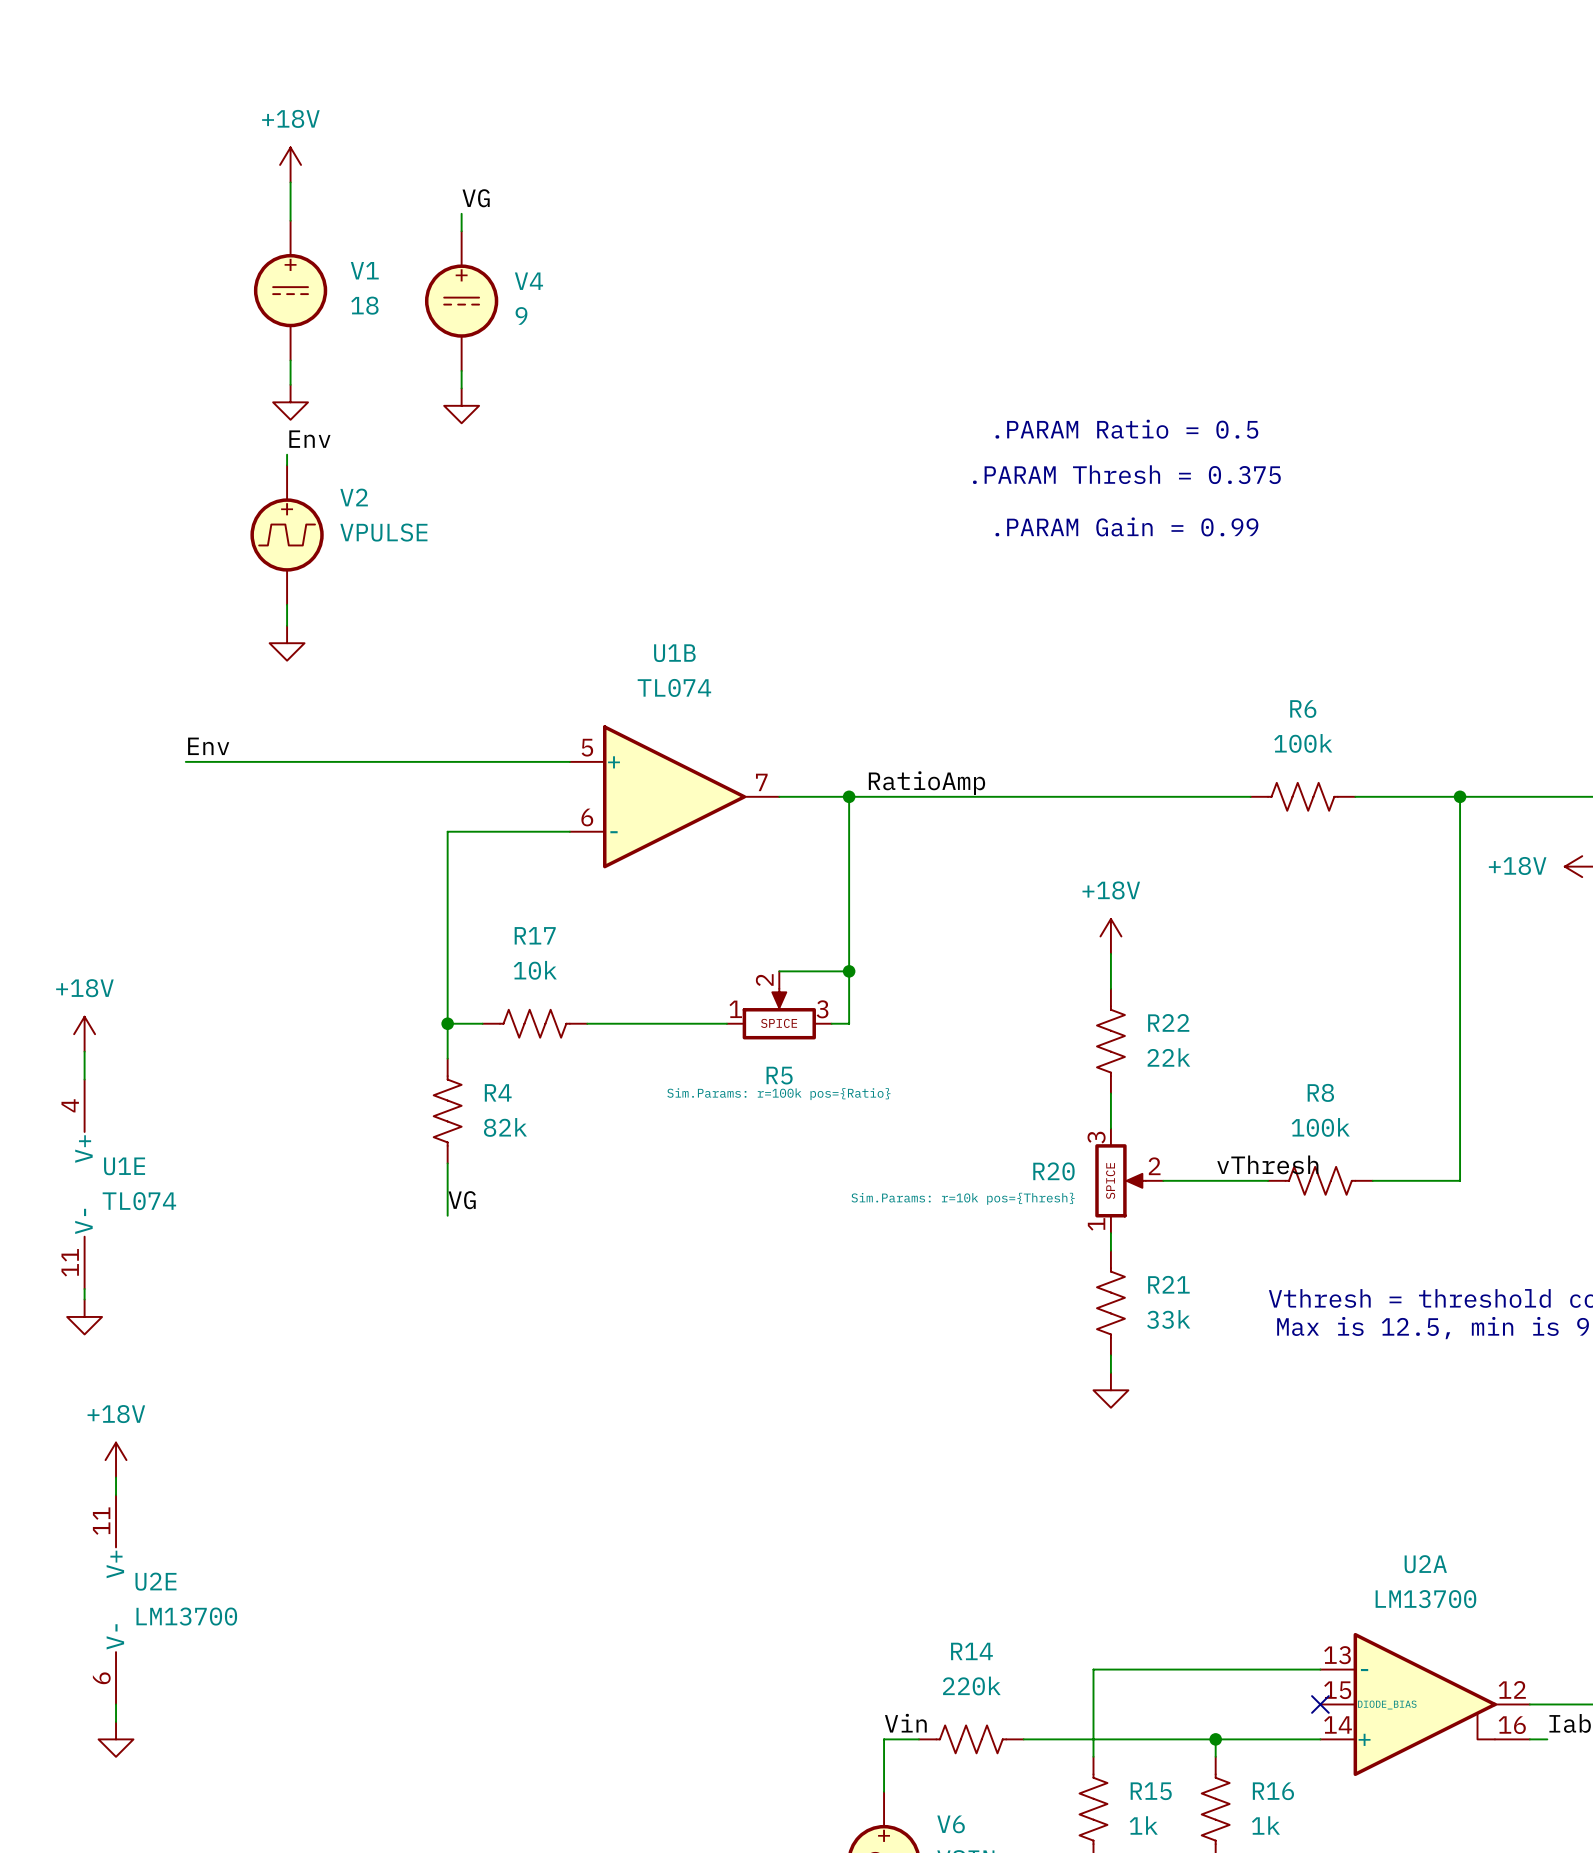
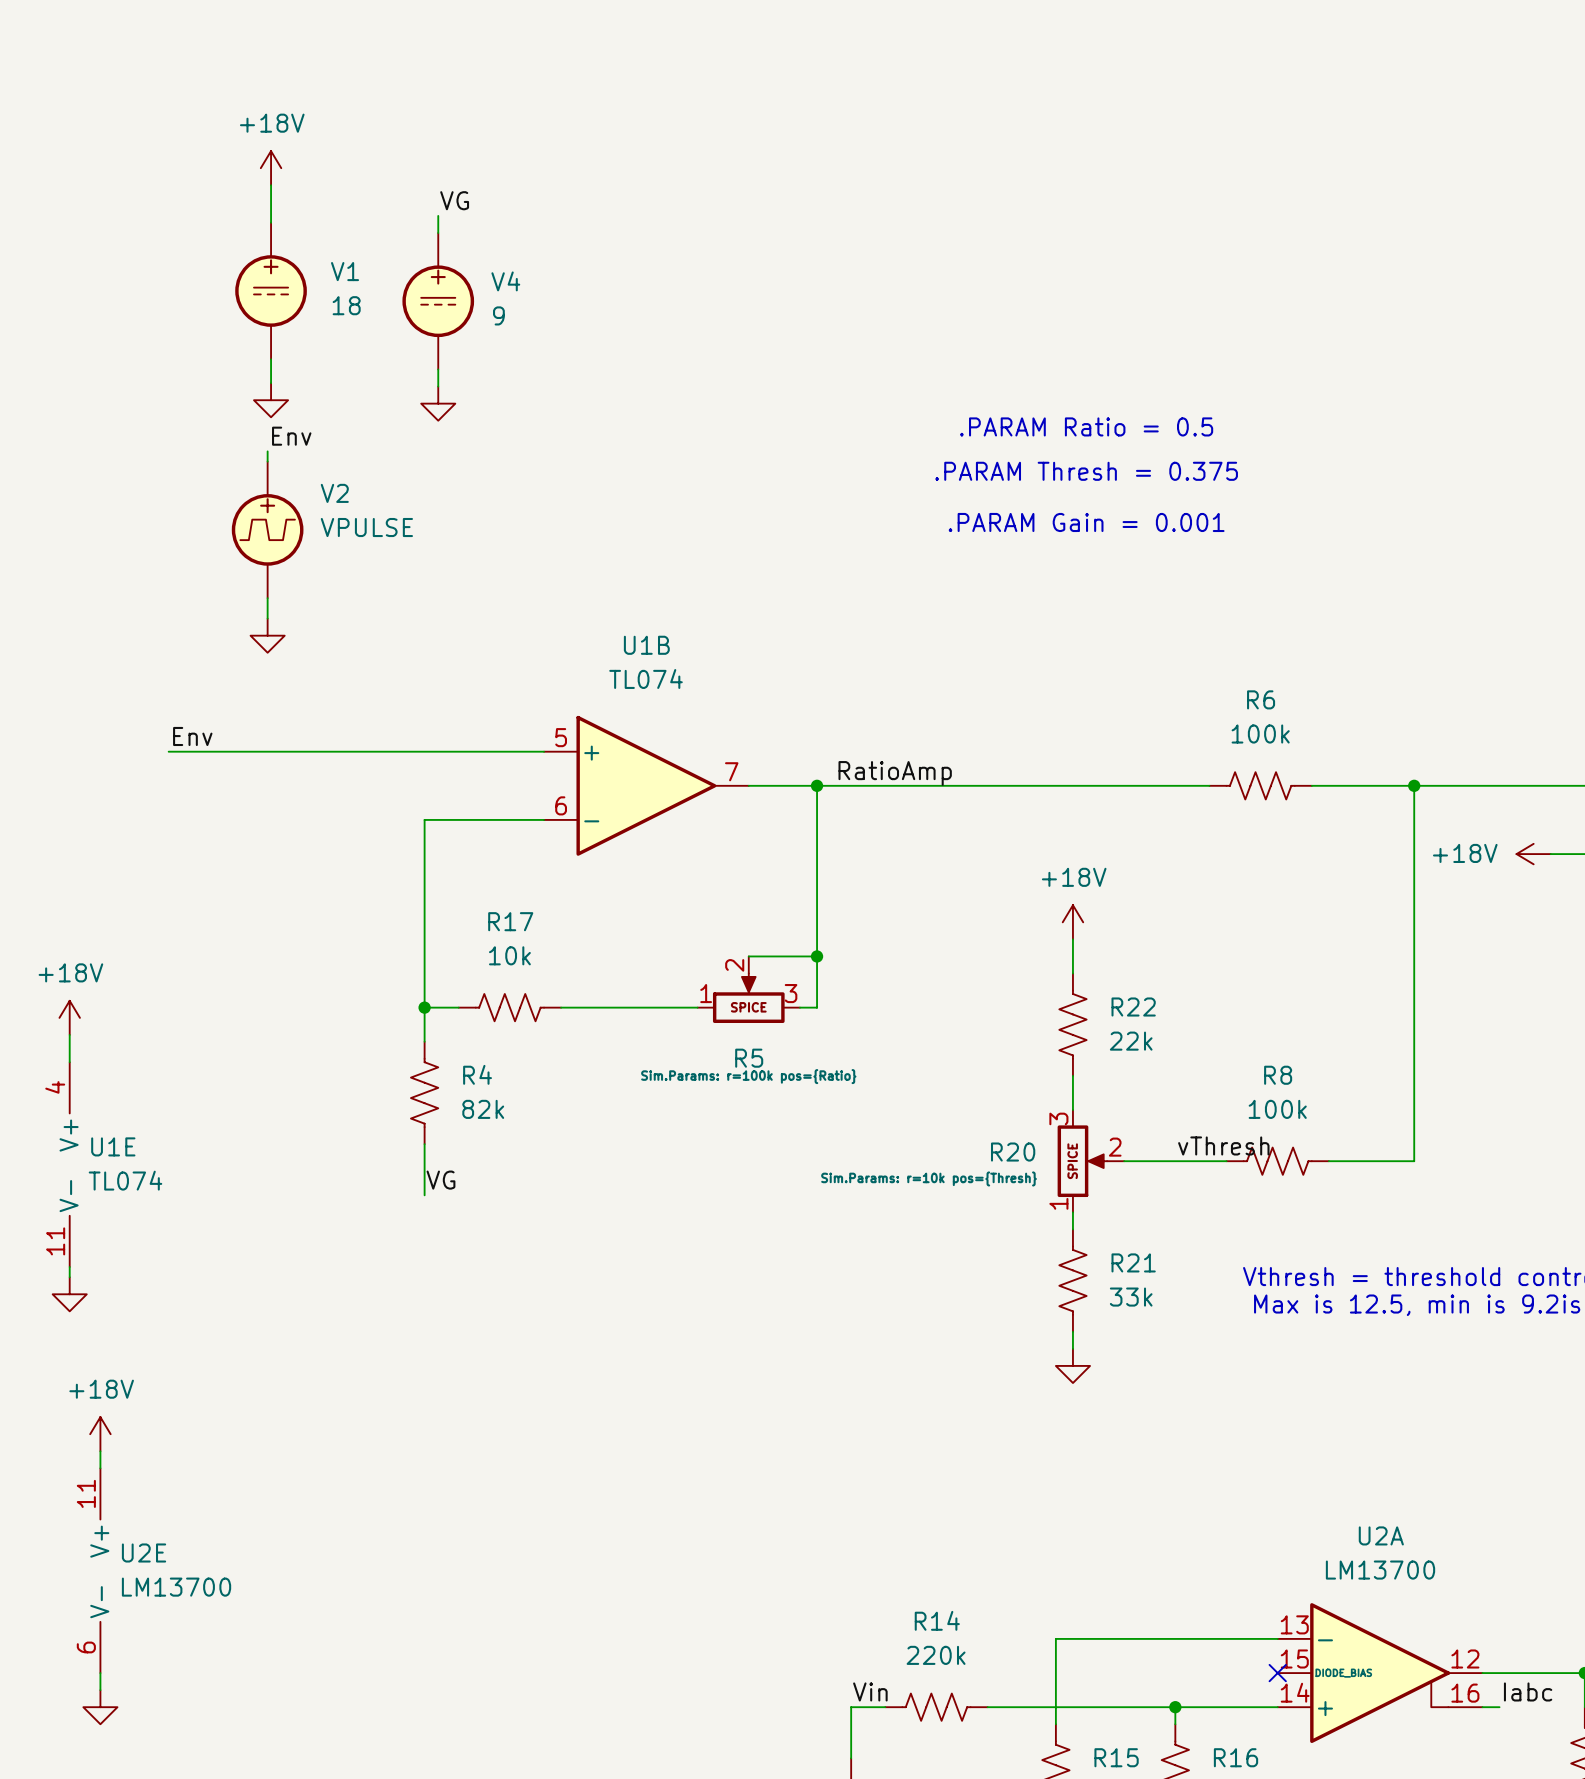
text: .PARAM Gain = 0.99 (1126, 526) -> .PARAM Gain = 0.001 (1086, 522)

